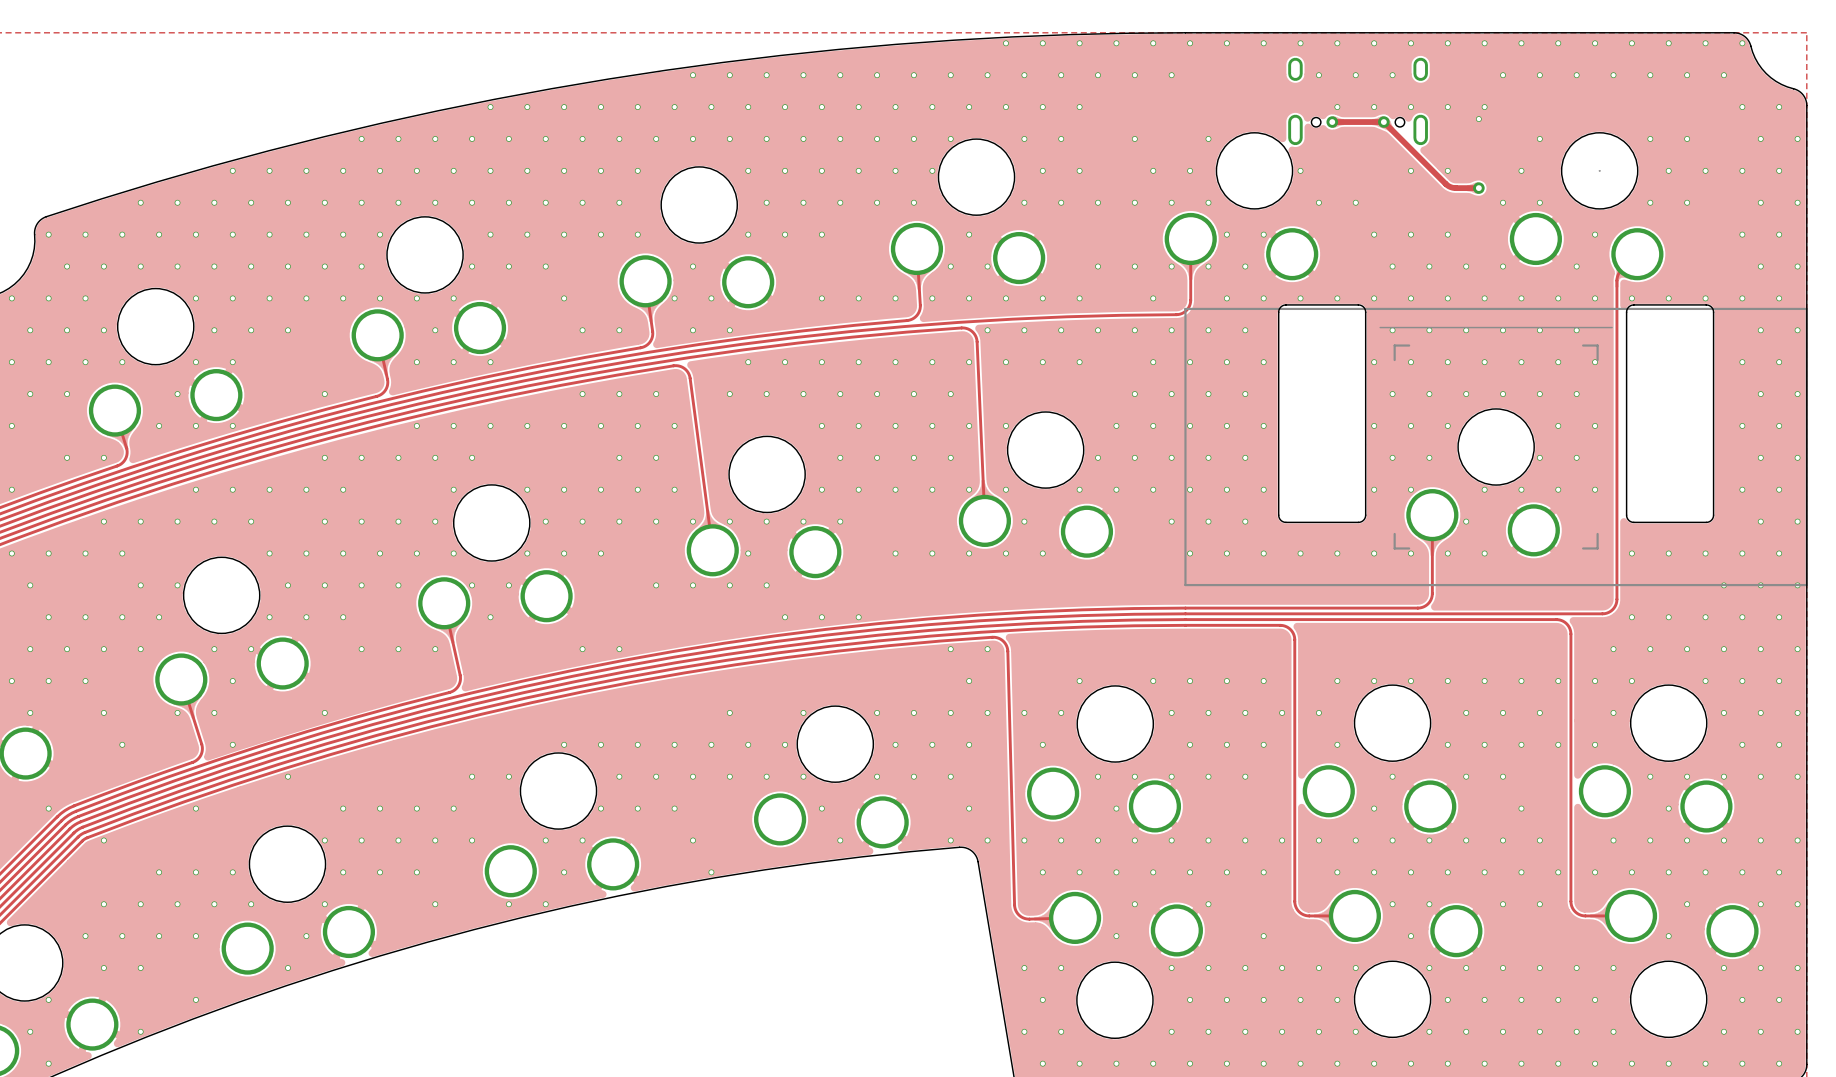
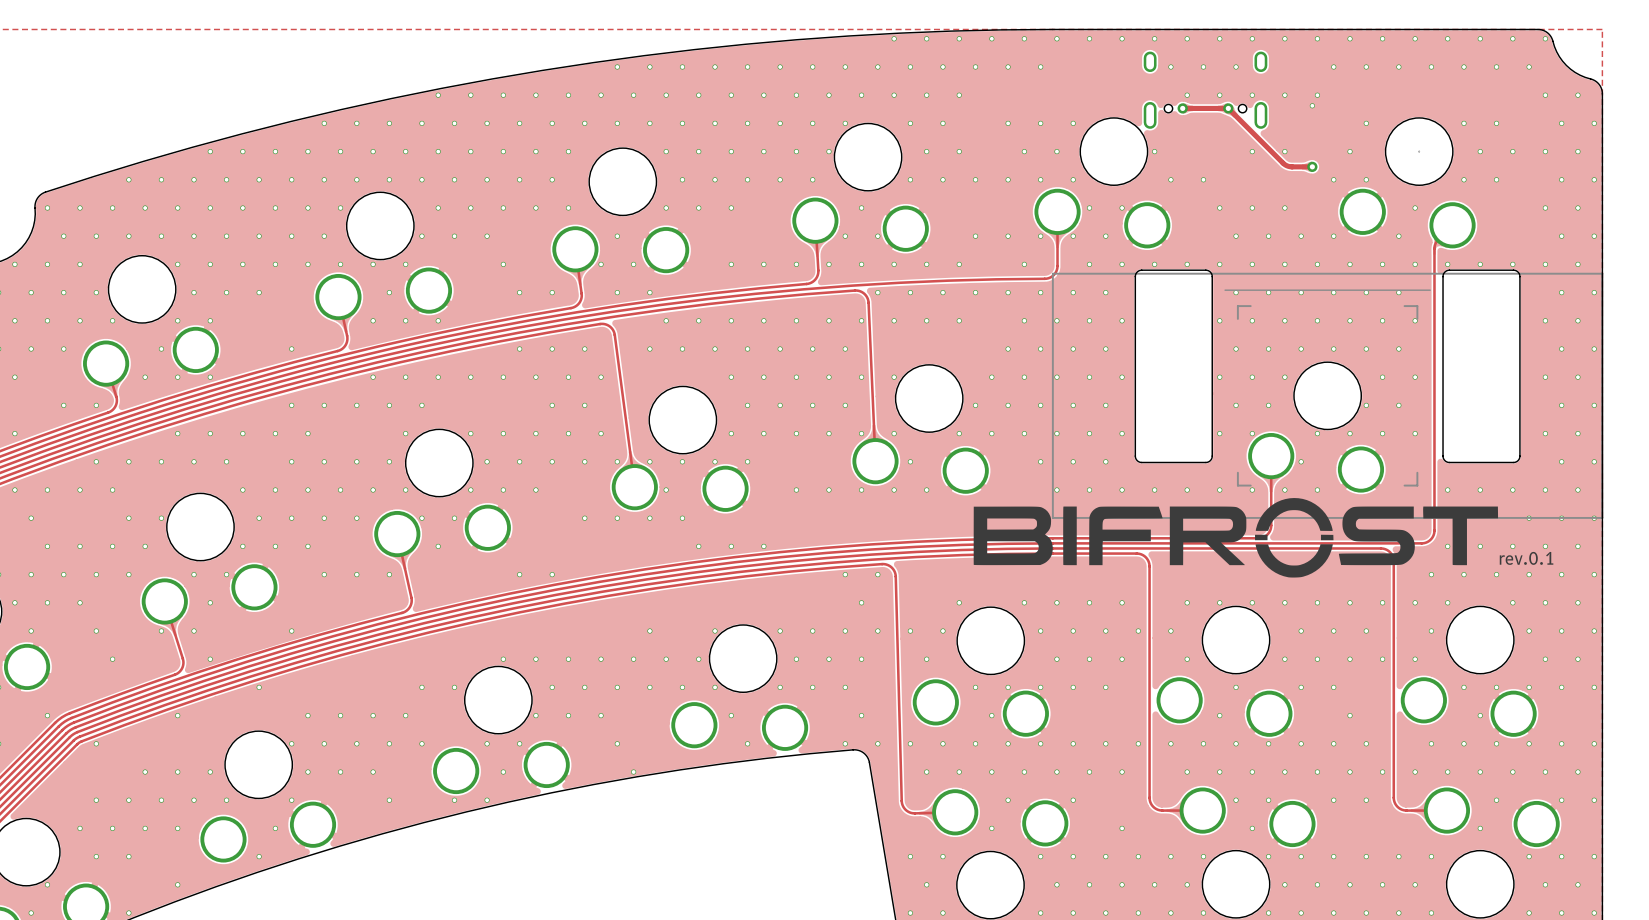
via: none -> (1040, 123)
drawing: none -> [973, 498, 1499, 578]
text: none -> rev.0.1 (1526, 558)

